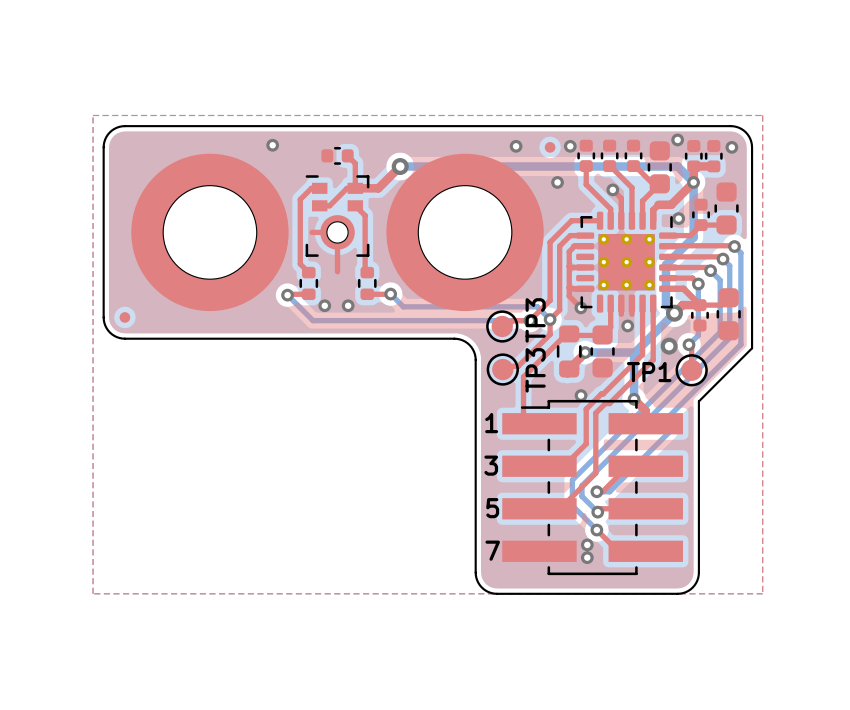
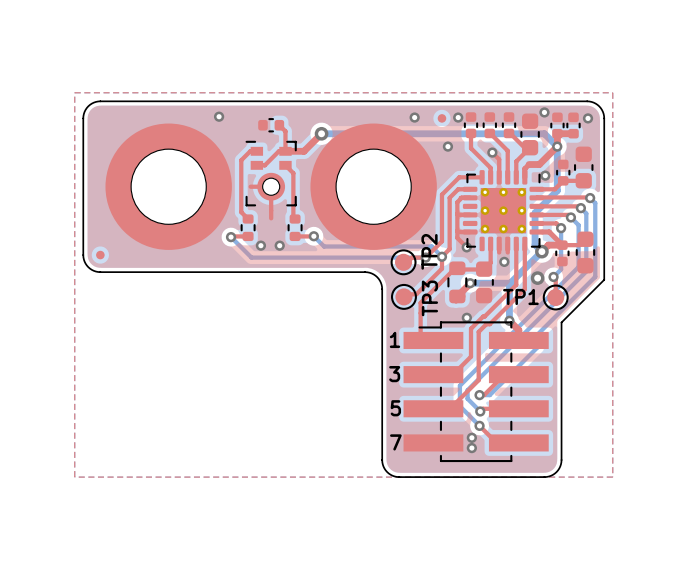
TP2 name: none -> TP2 (429, 251)
text: TP3 (535, 320) -> none
TP1 name: none -> TP1 (520, 296)
text: TP3 (535, 370) -> none
TP3 name: none -> TP3 (429, 298)
text: TP1 (649, 372) -> none

